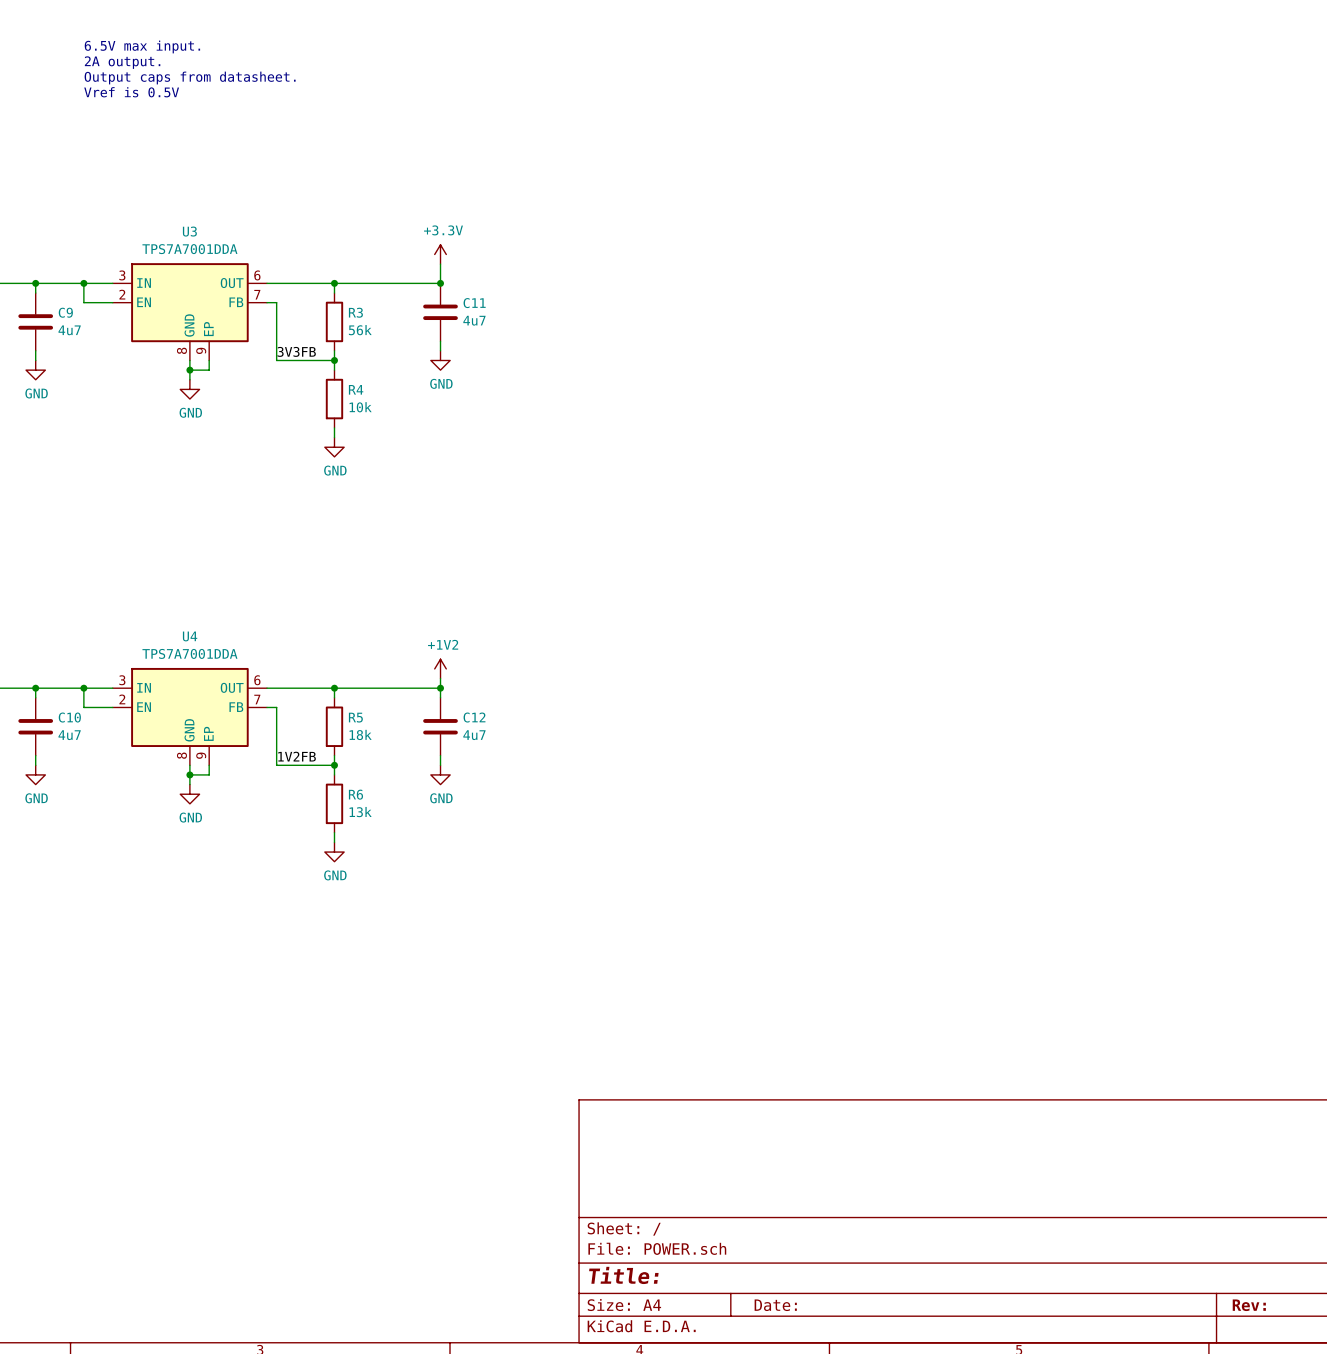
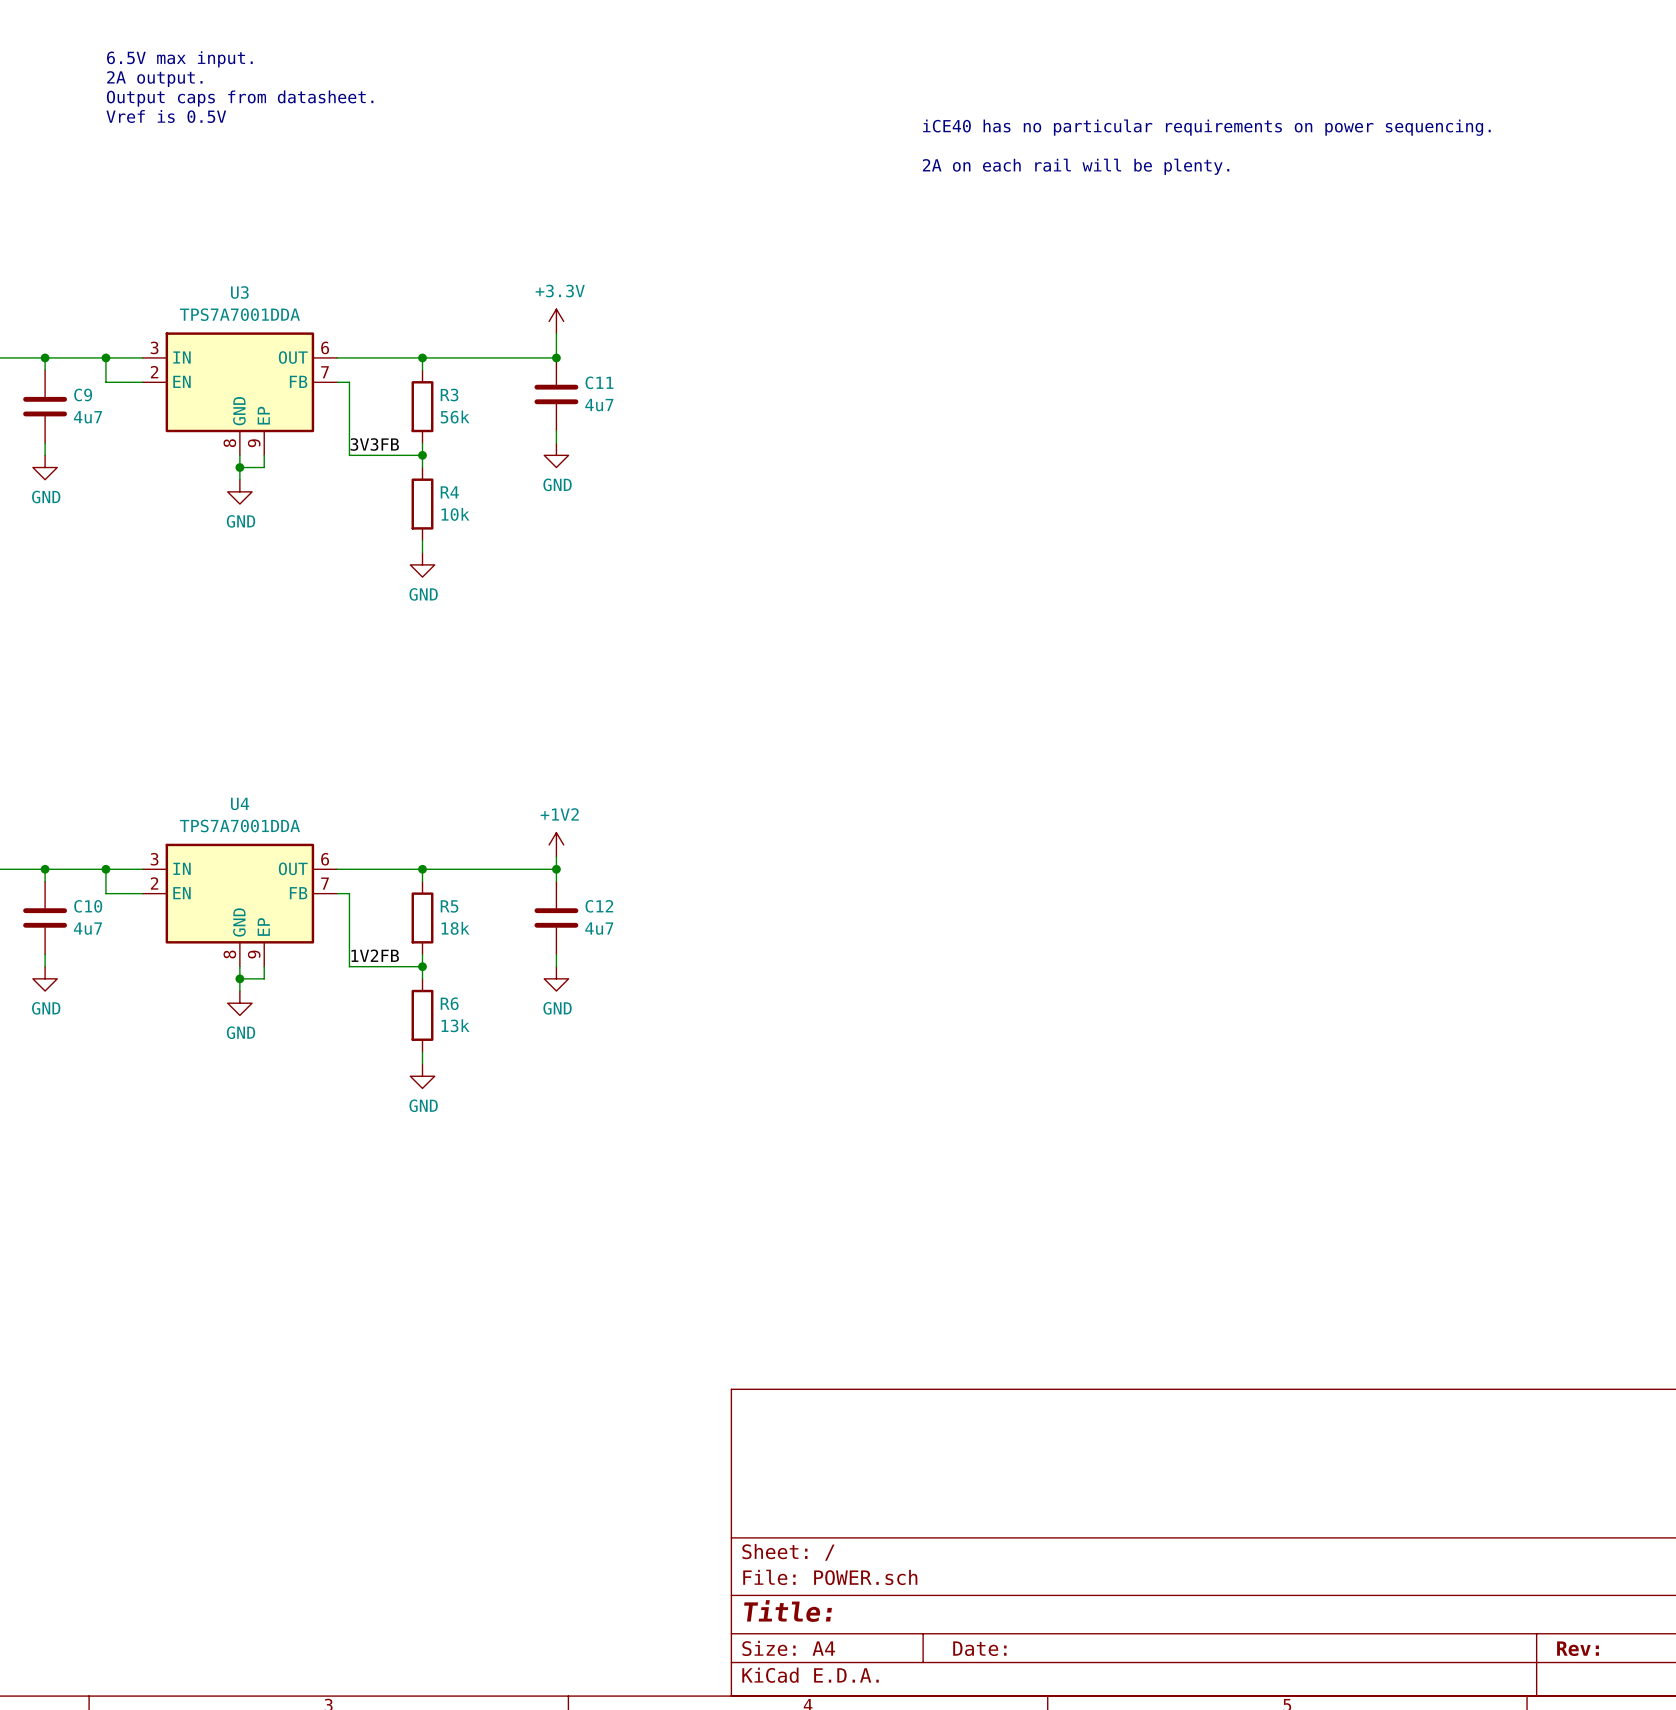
text: none -> iCE40 has no particular requirements on power sequencing. (1206, 127)
text: none -> 2A on each rail will be plenty. (1076, 166)

